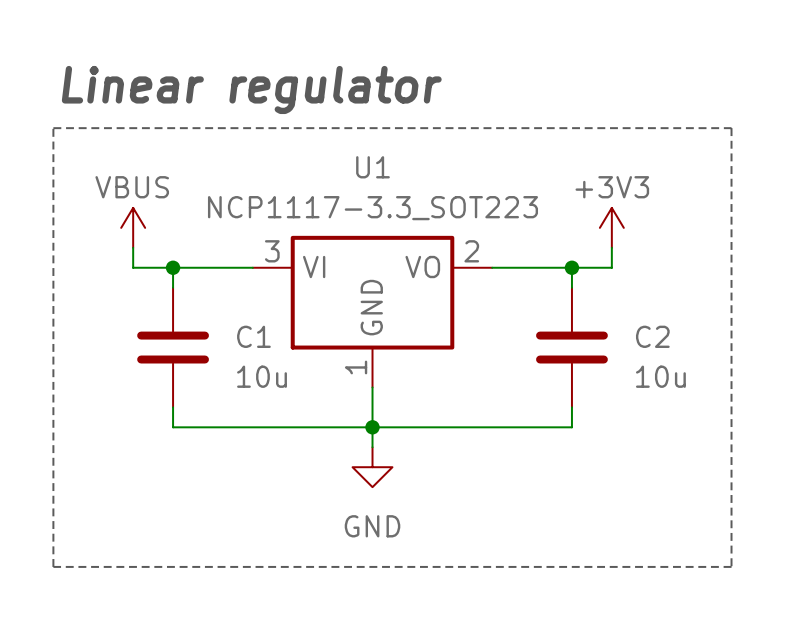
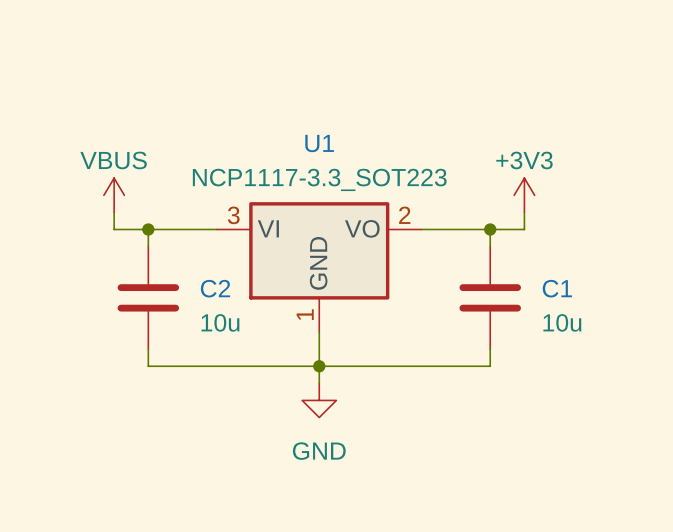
text: Linear regulator (251, 89) -> none
line: (53, 128) (731, 128) (731, 566) (53, 566) (53, 128) -> none
C1 name: C1 (253, 336) -> C2 (215, 288)
C2 name: C2 (652, 336) -> C1 (557, 288)

